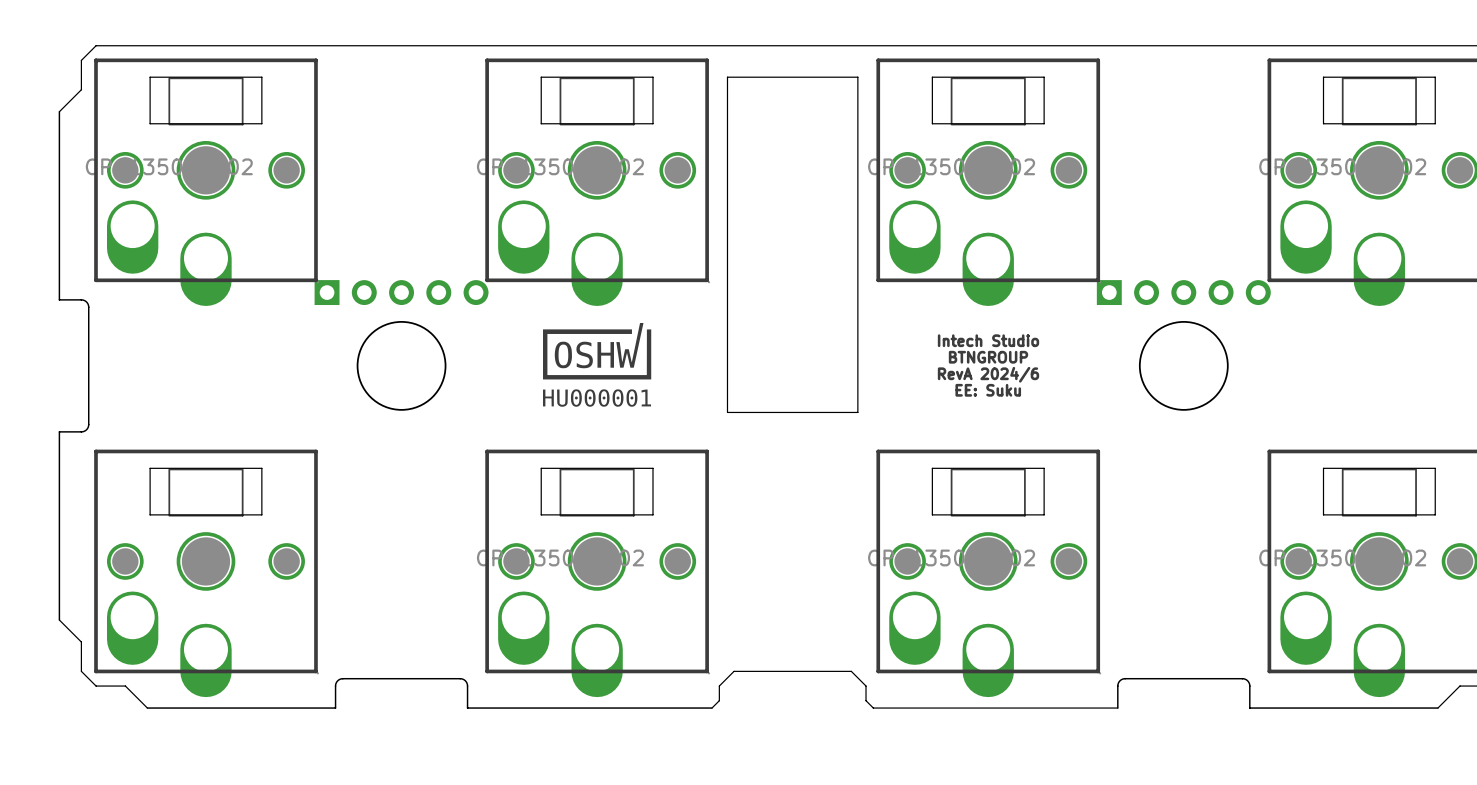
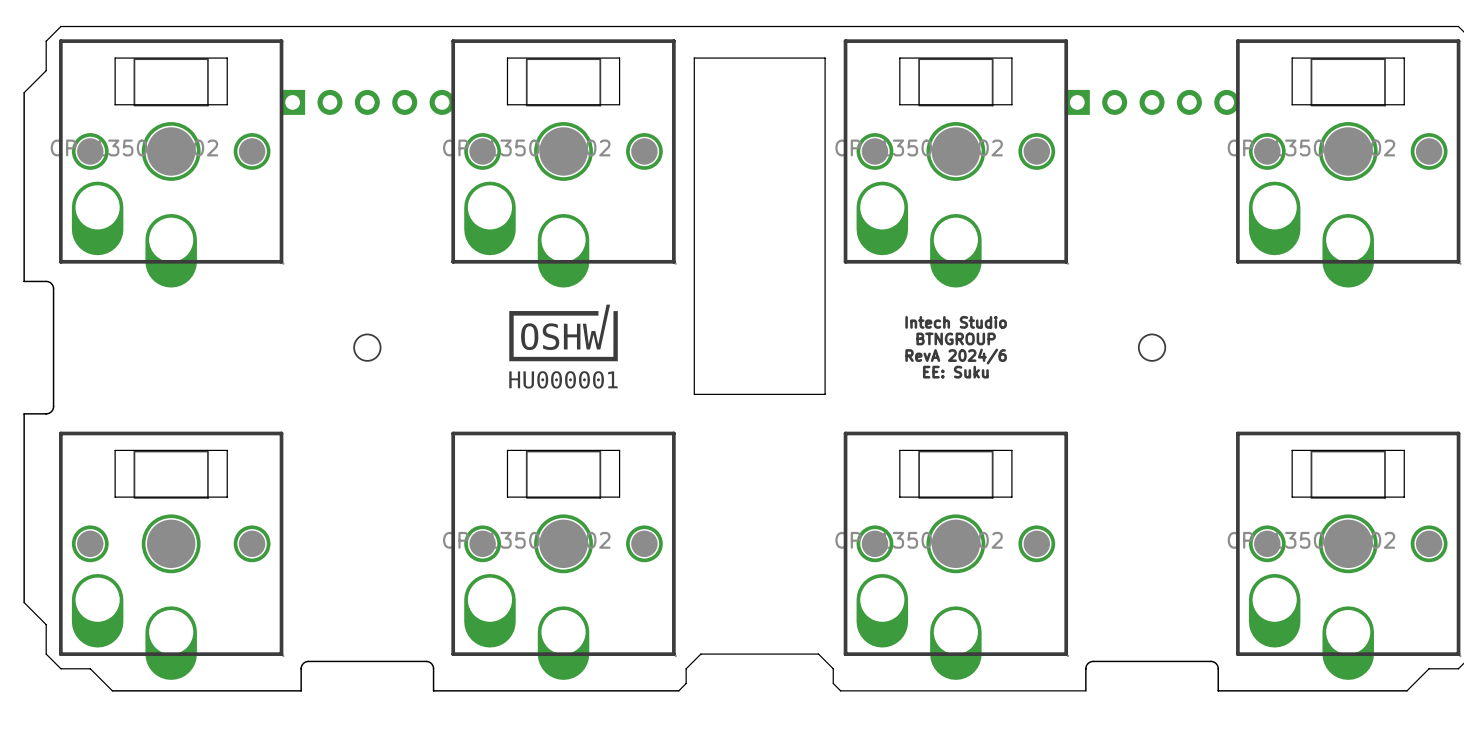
part position: (401, 292) -> (367, 102)
part position: (1183, 292) -> (1152, 102)
round board edge: [356, 321, 447, 411] -> none
round board edge: [1138, 321, 1229, 411] -> none
drawing: none -> [353, 333, 382, 362]
drawing: none -> [1137, 333, 1167, 362]

